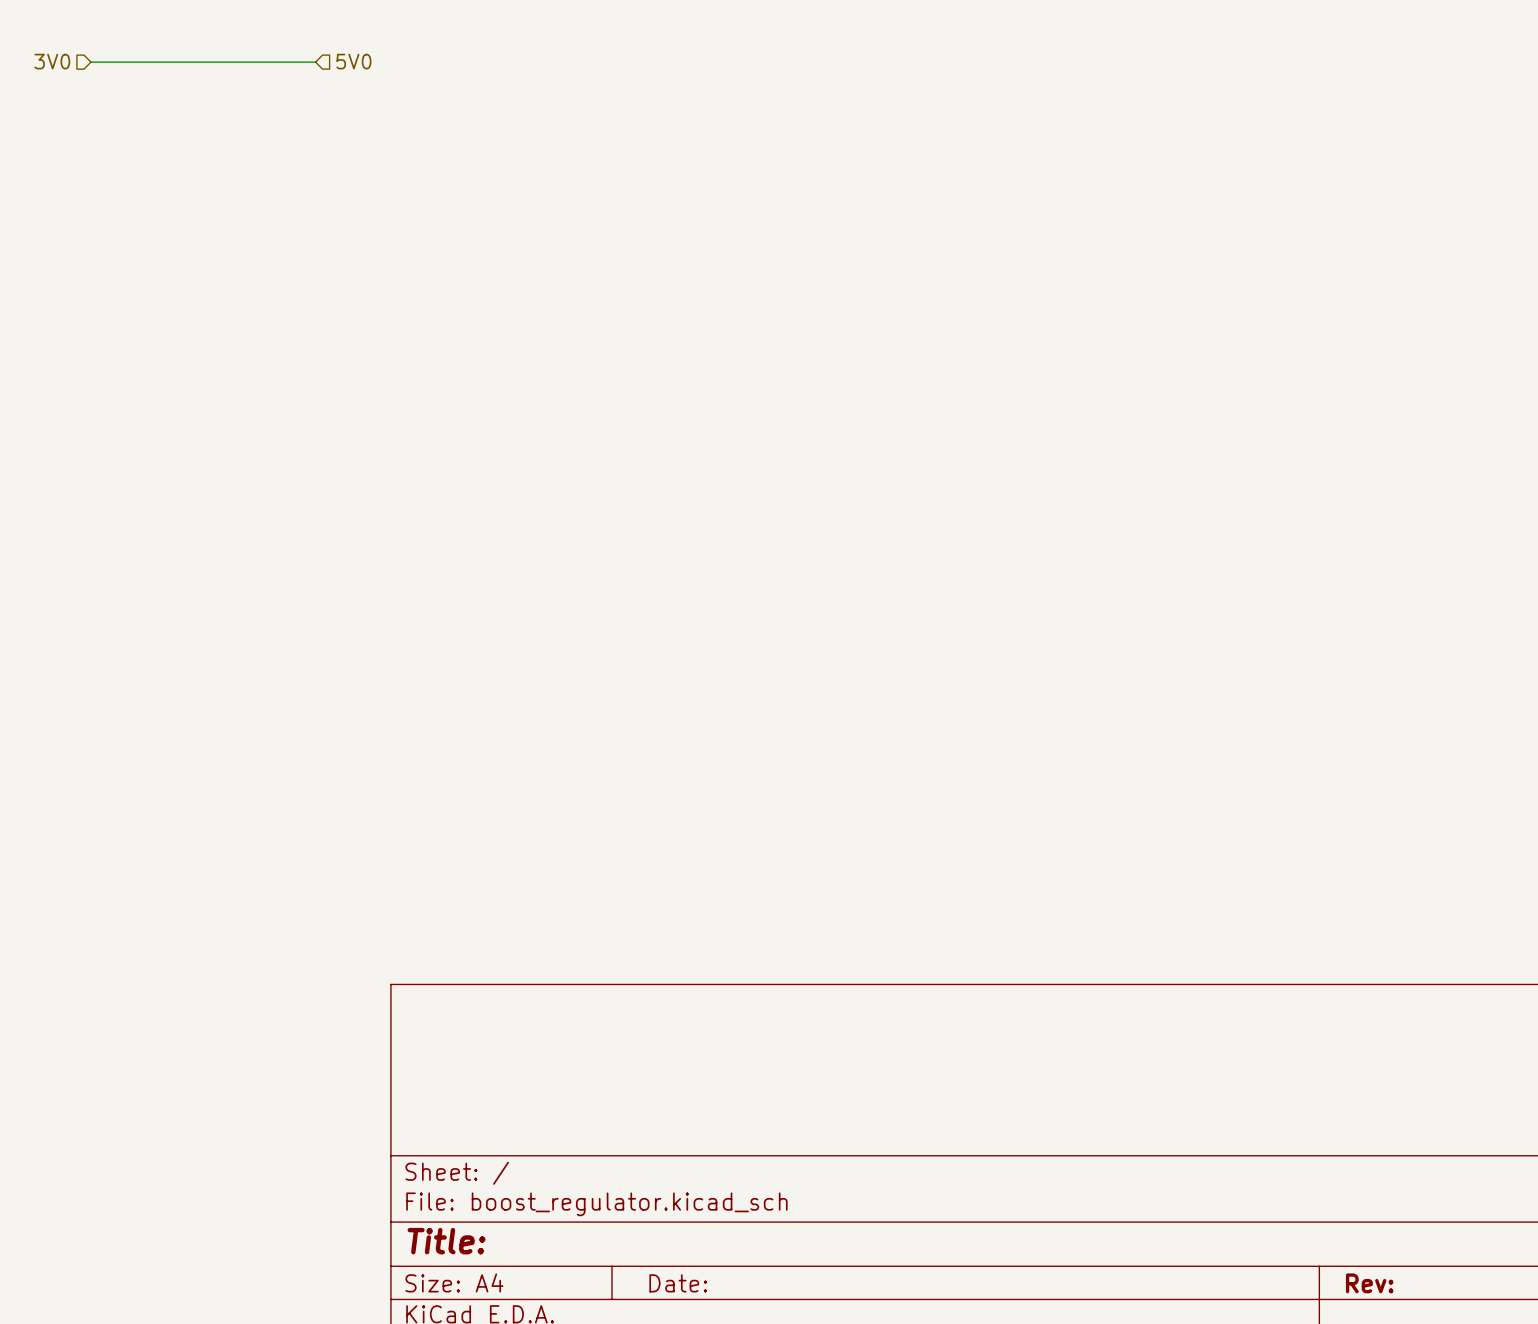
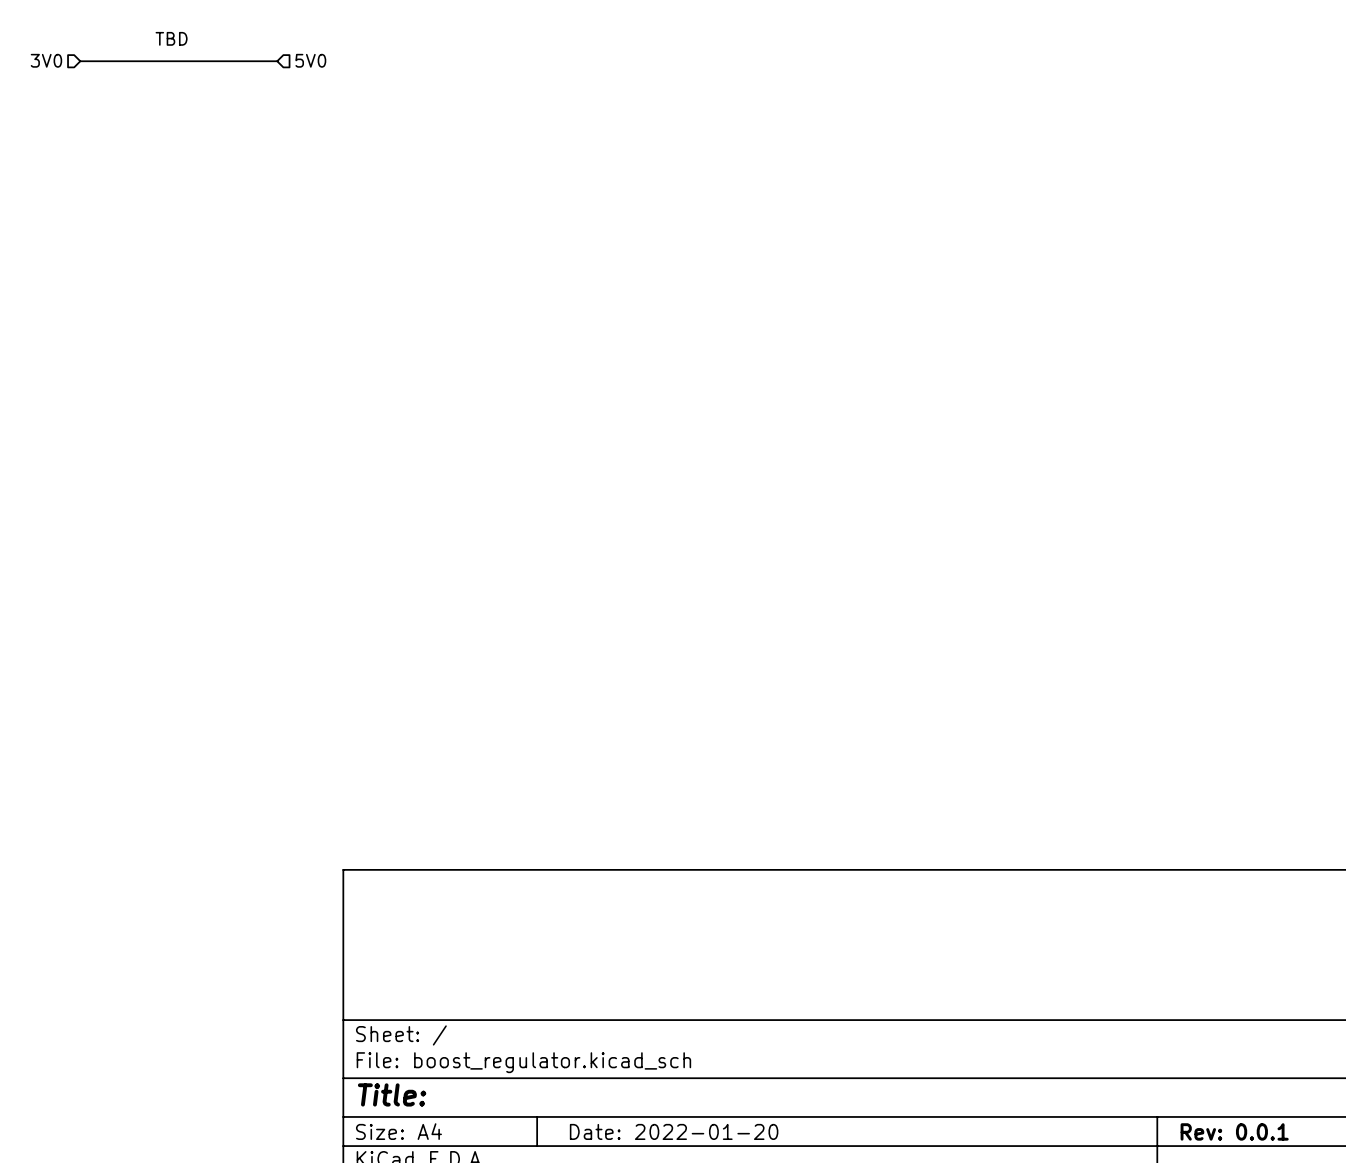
text: none -> TBD (171, 38)
title block: Date: (678, 1283) -> Date: 2022-01-20 (674, 1131)
title block: Rev: (1369, 1283) -> Rev: 0.0.1 (1234, 1131)

